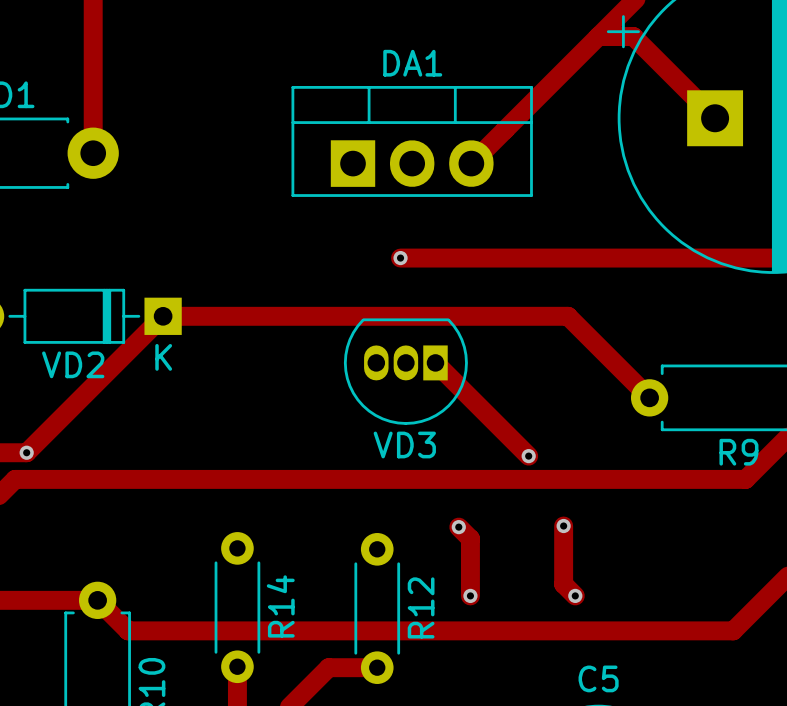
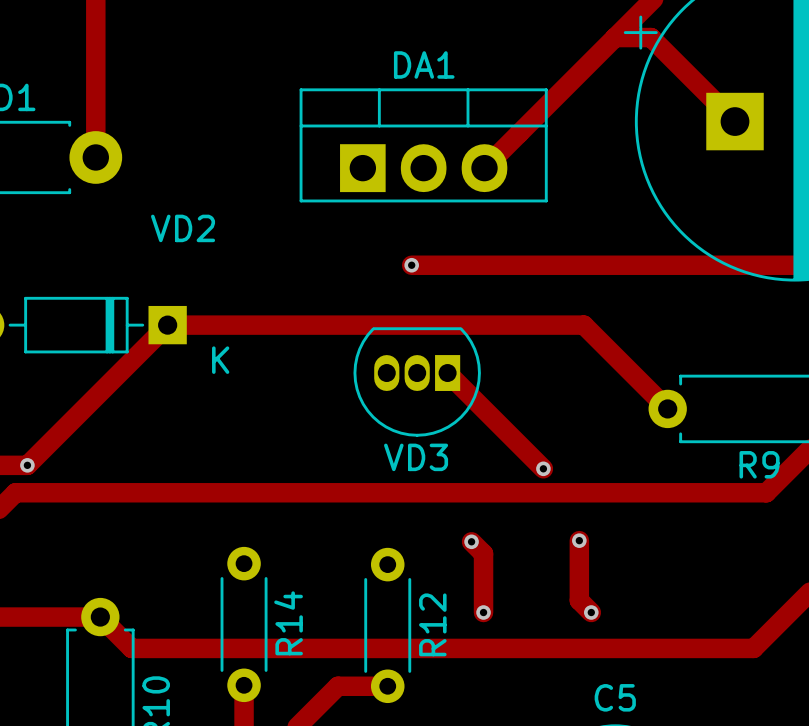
VD2 text position: K (163, 357) -> K (220, 360)
VD2 name position: VD2 (73, 364) -> VD2 (183, 228)

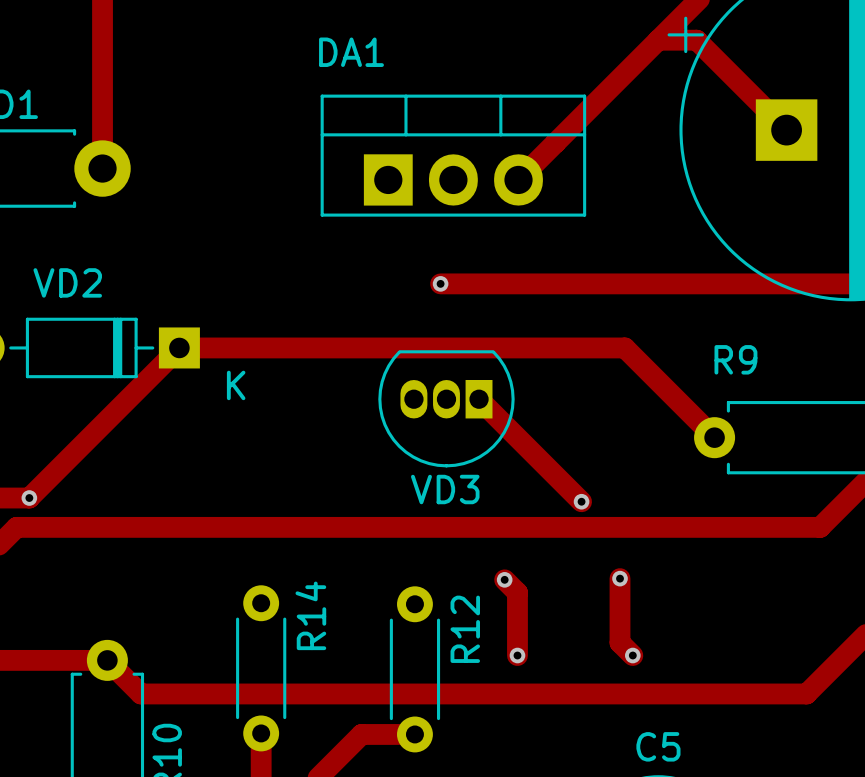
DA1 name position: DA1 (424, 64) -> DA1 (351, 52)
VD2 name position: VD2 (183, 228) -> VD2 (67, 282)
R9 name position: R9 (759, 464) -> R9 (735, 359)
R14 name position: R14 (288, 623) -> R14 (310, 615)
R12 name position: R12 (432, 624) -> R12 (465, 629)

